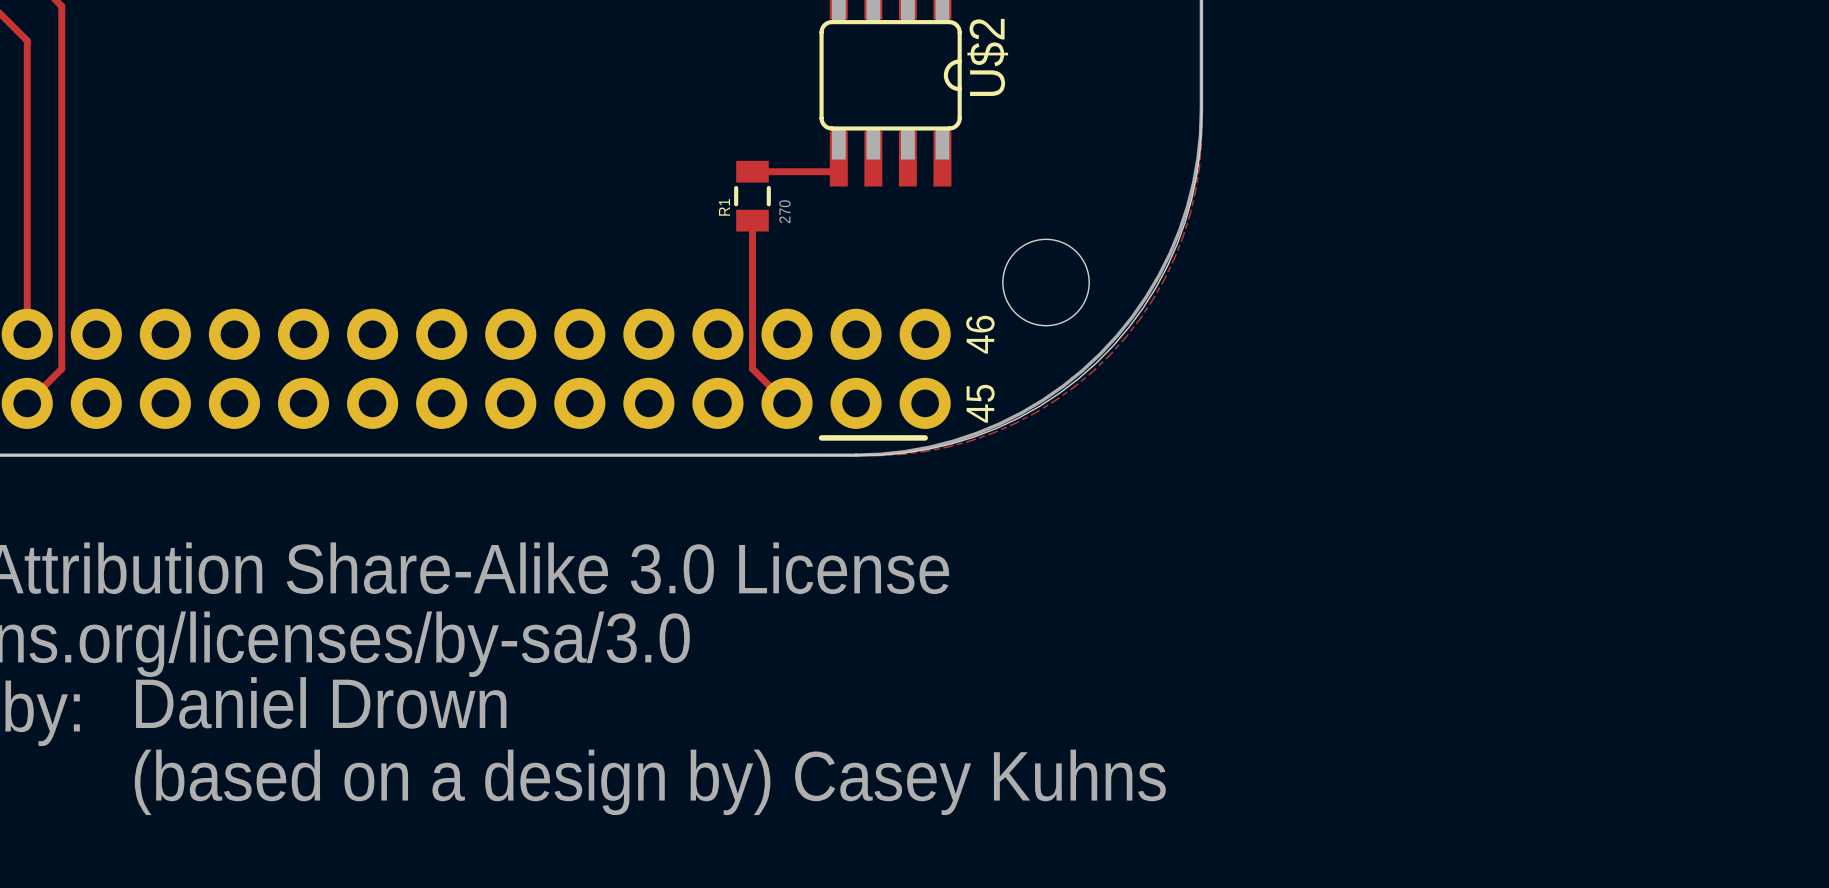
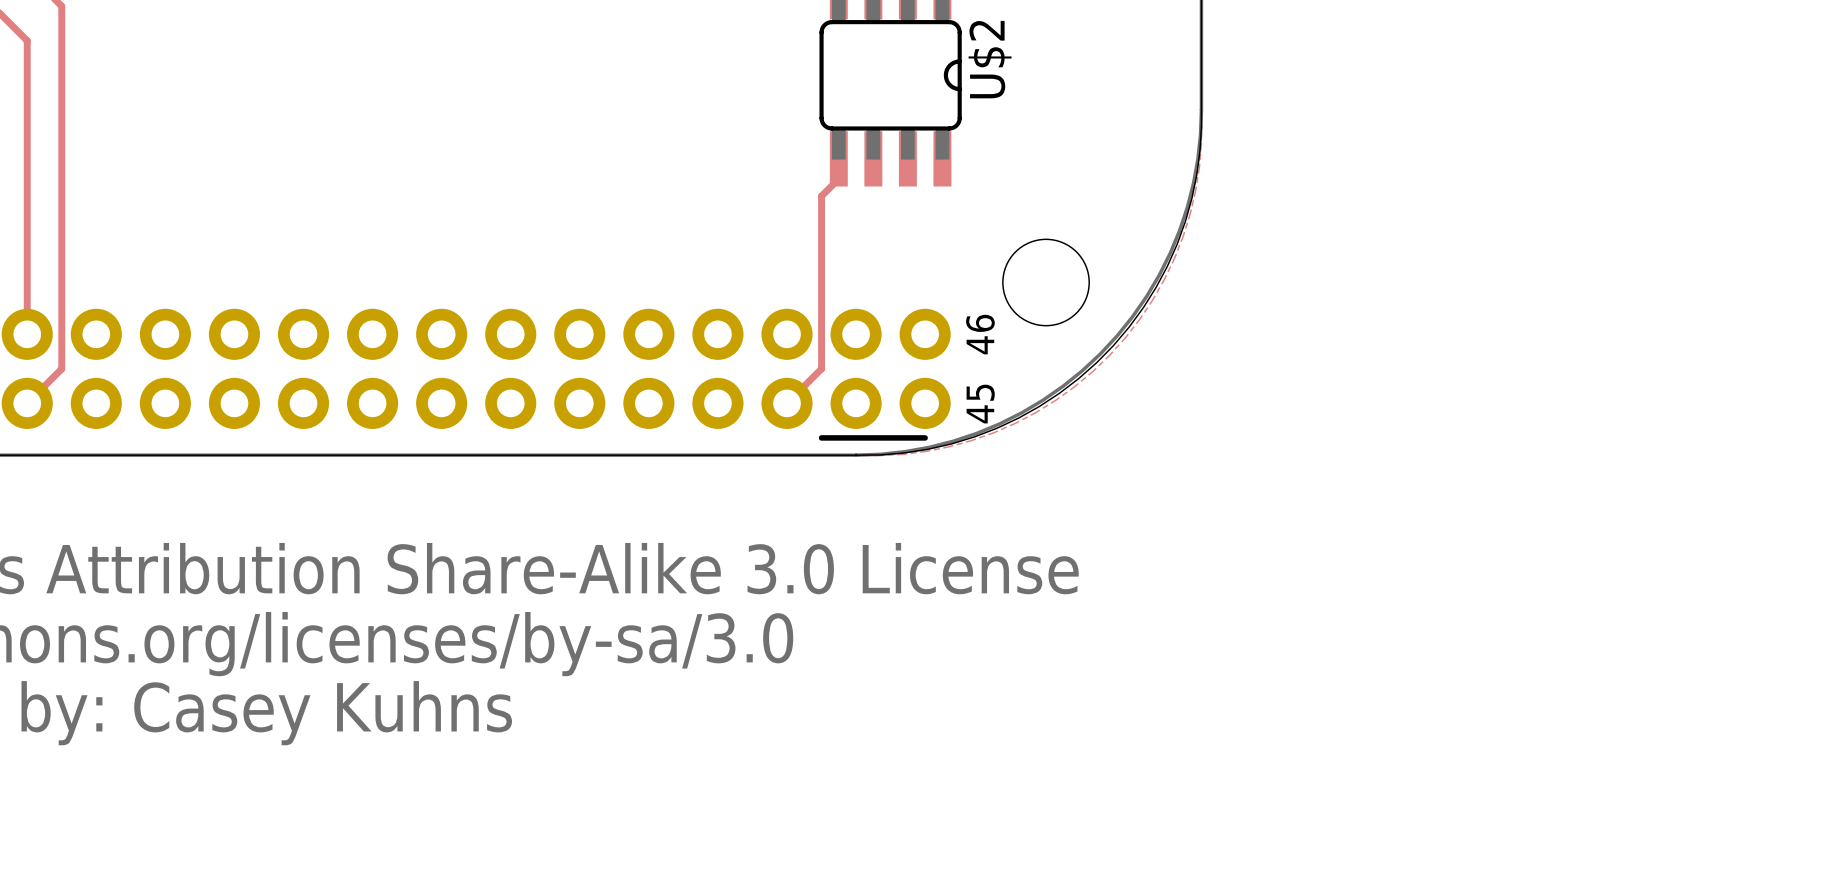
track: (752, 171) (831, 171) (838, 178) -> none
R1: 270 (752, 196) -> none
track: (752, 220) (752, 368) (787, 403) -> (838, 178) (821, 196) (821, 368) (787, 403)
text: Daniel Drown (321, 702) -> none
text: (based on a design by) Casey Kuhns (650, 782) -> Casey Kuhns (323, 713)

